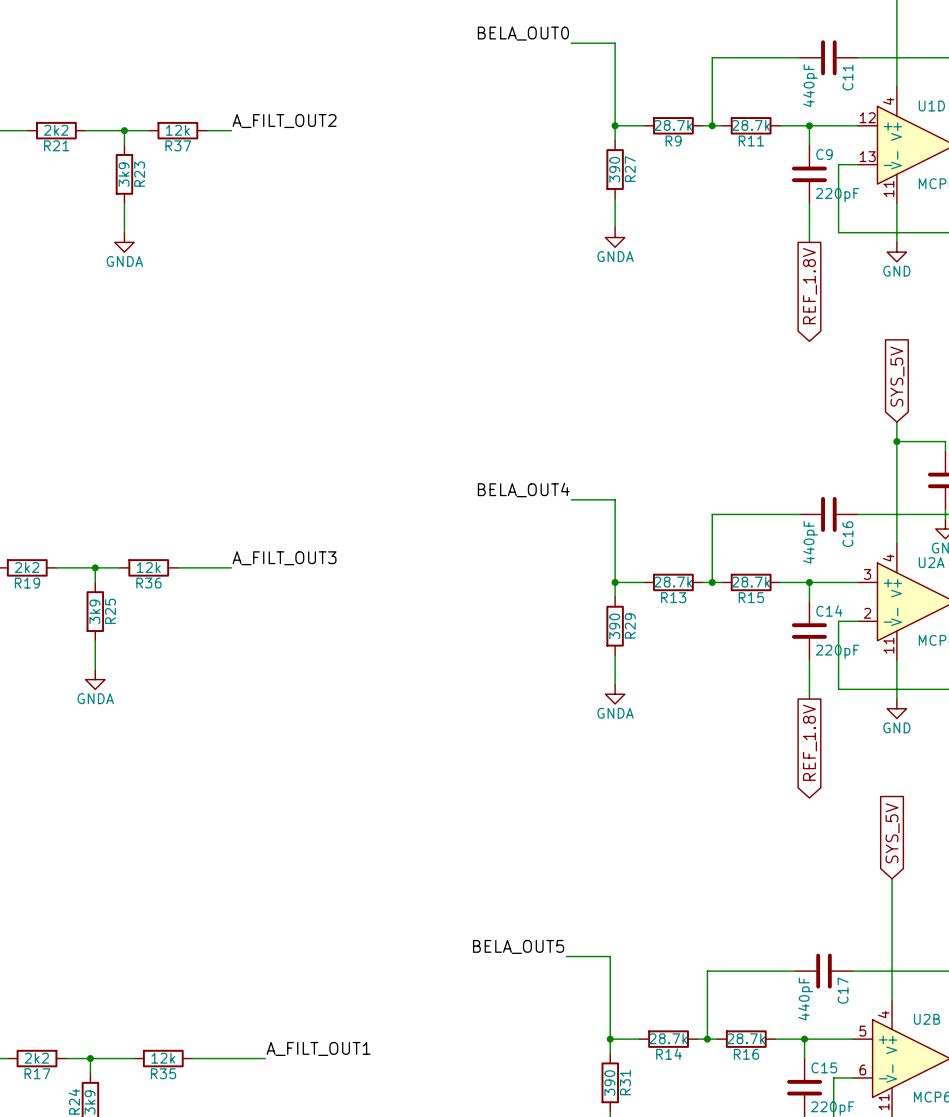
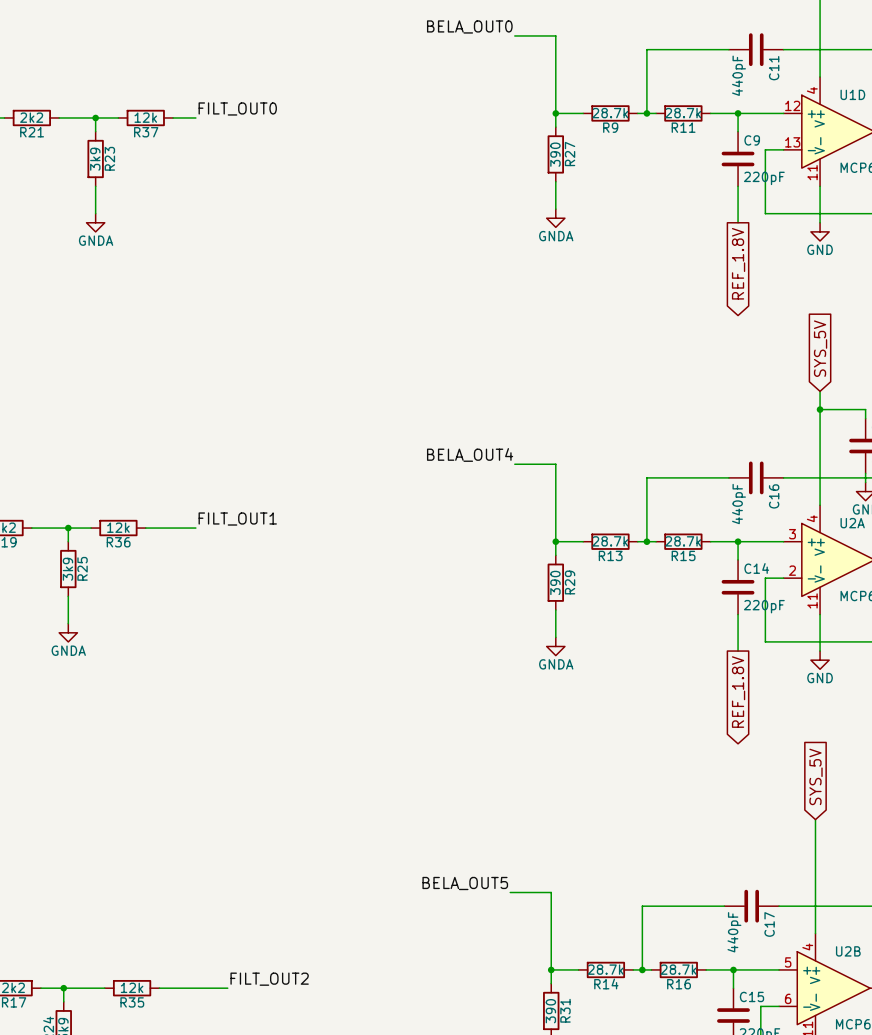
label: A_FILT_OUT2 (284, 121) -> FILT_OUT0 (237, 108)
label: A_FILT_OUT3 (284, 558) -> FILT_OUT1 (237, 519)
label: A_FILT_OUT1 (318, 1048) -> FILT_OUT2 (269, 979)

